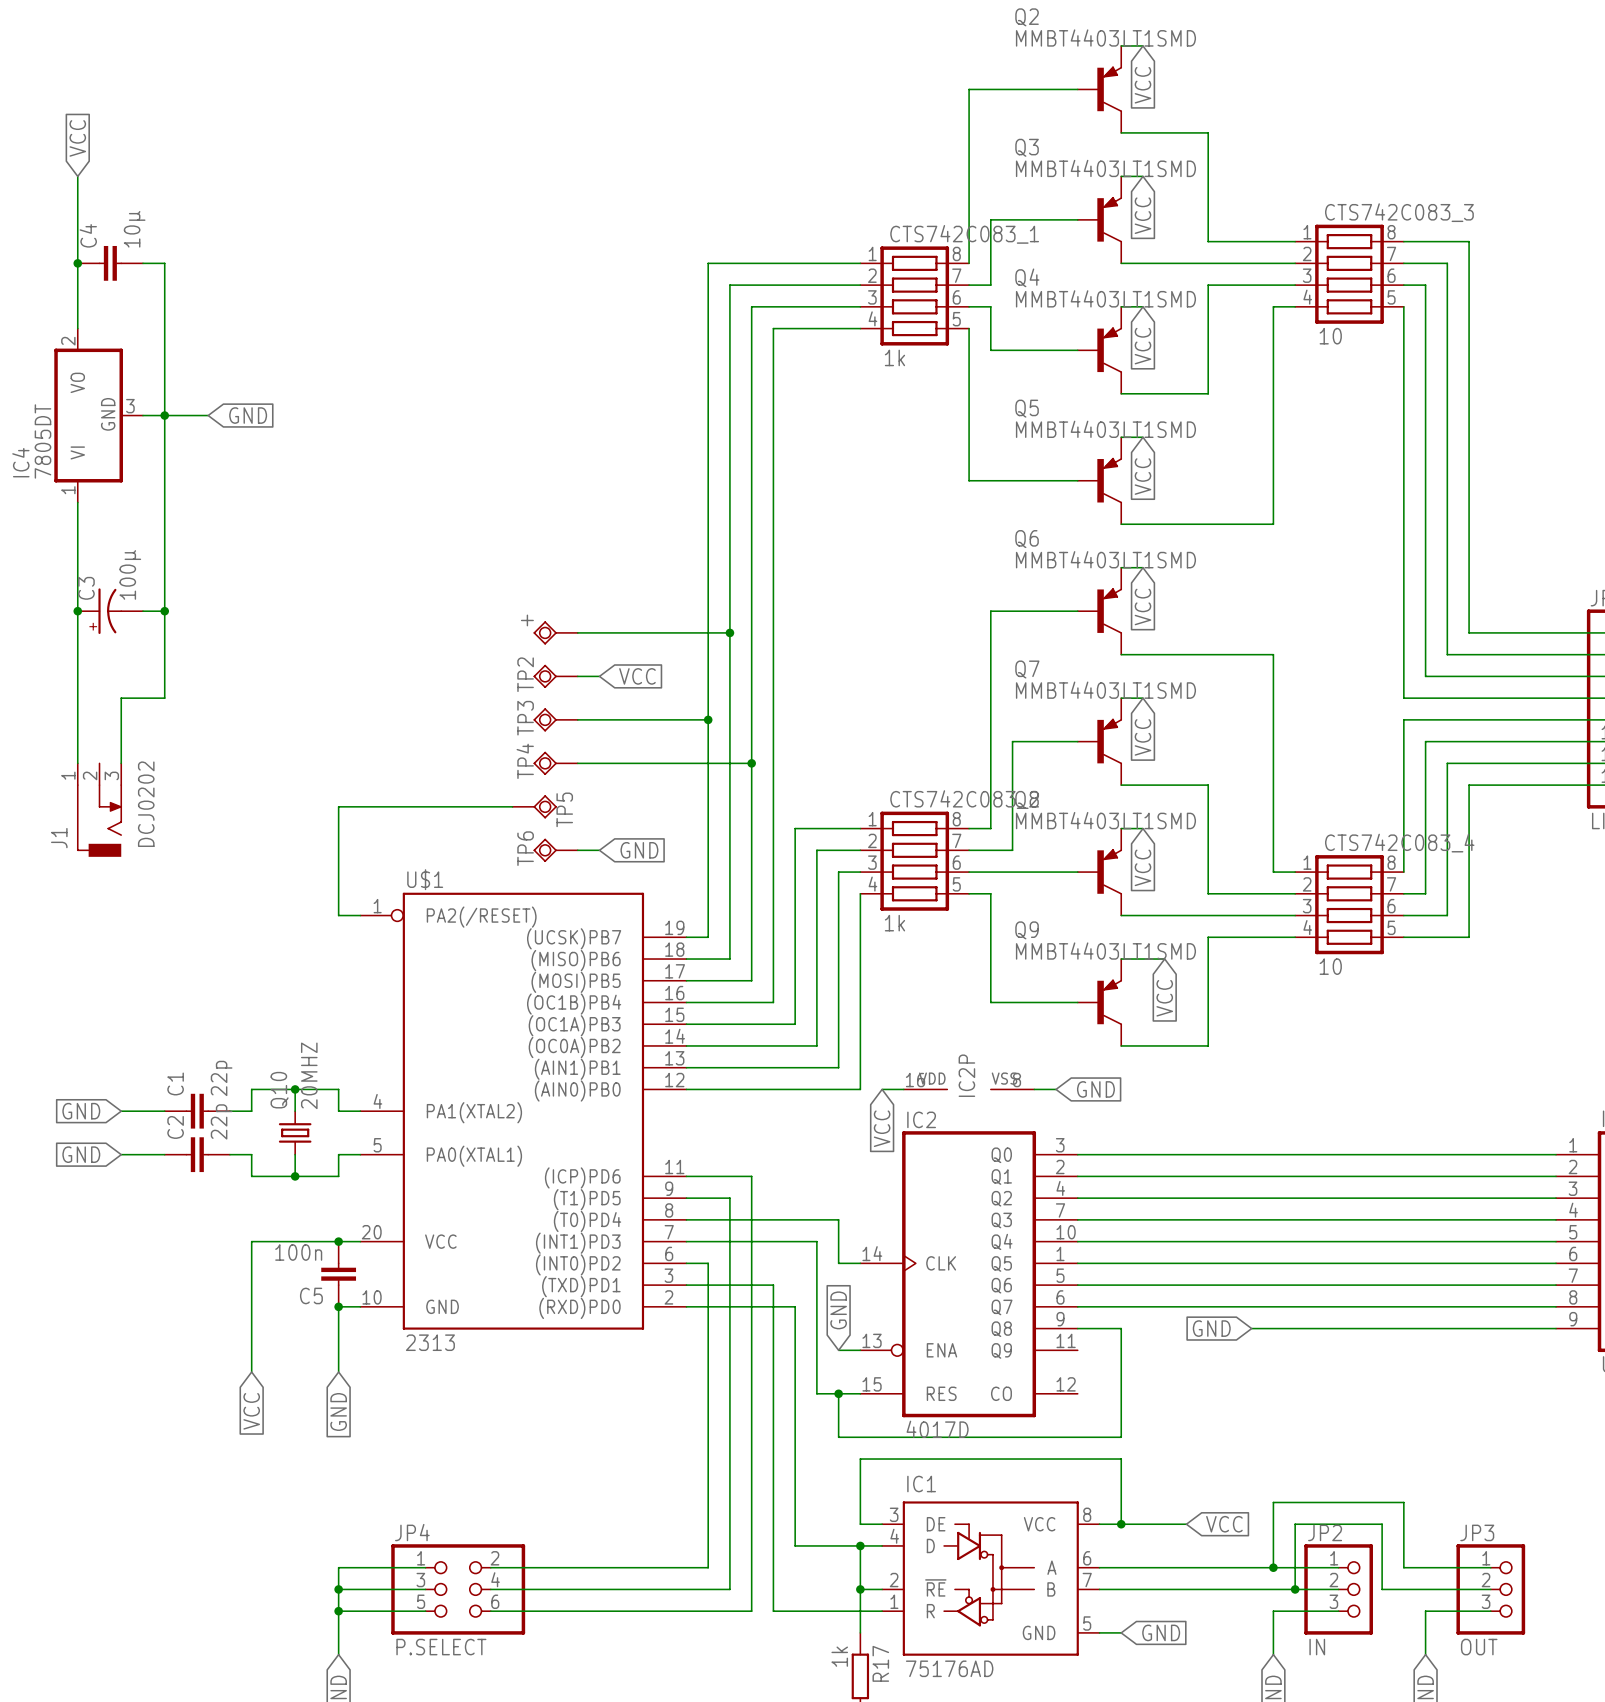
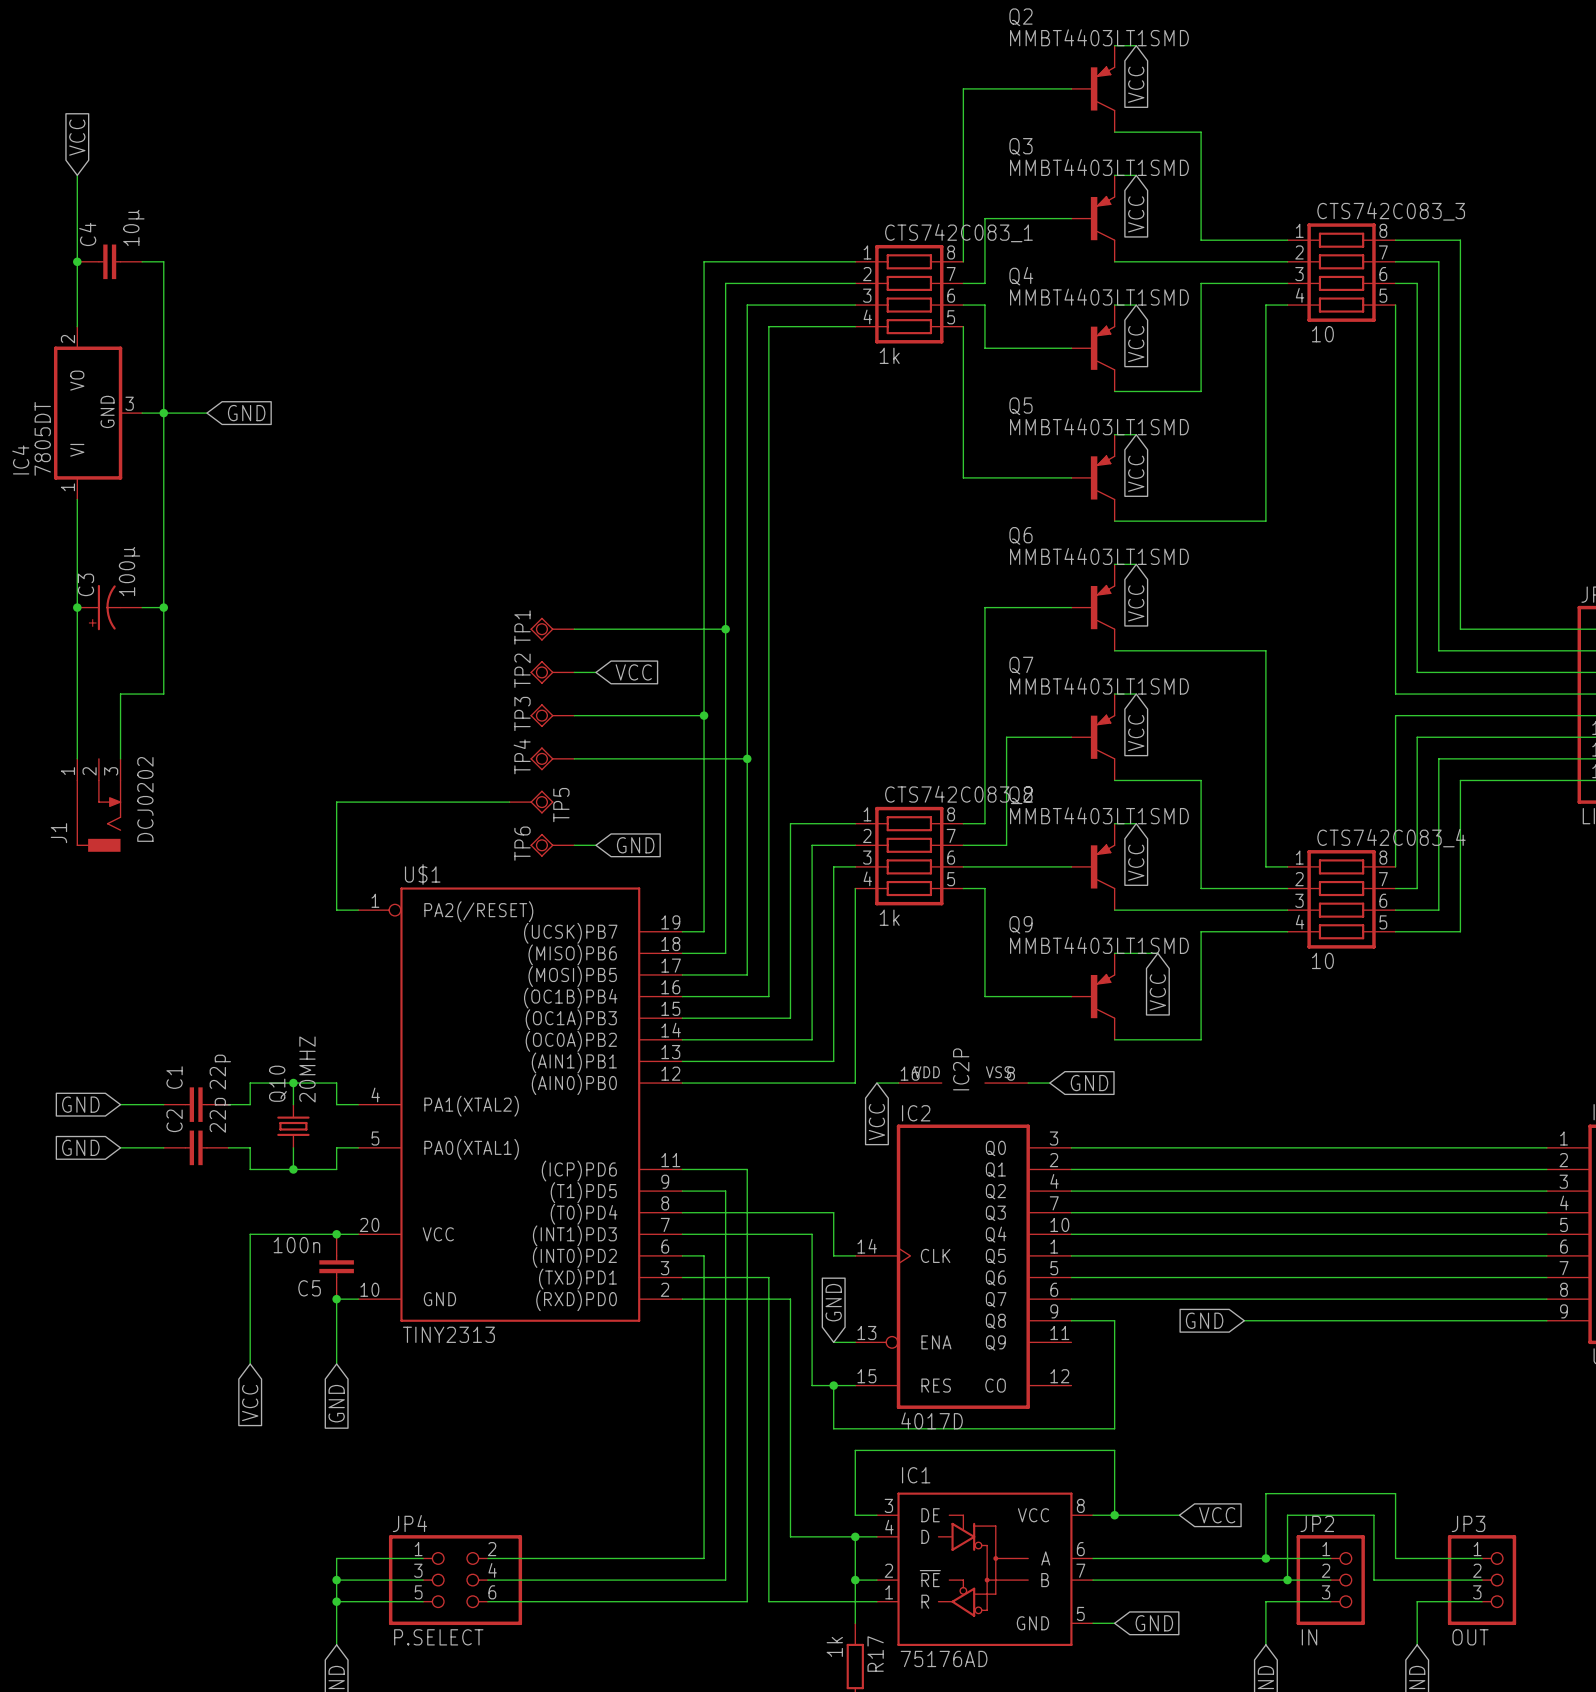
TP1 name: + (527, 620) -> TP1 (522, 627)
U$1 value: 2313 (430, 1342) -> TINY2313 (448, 1334)

